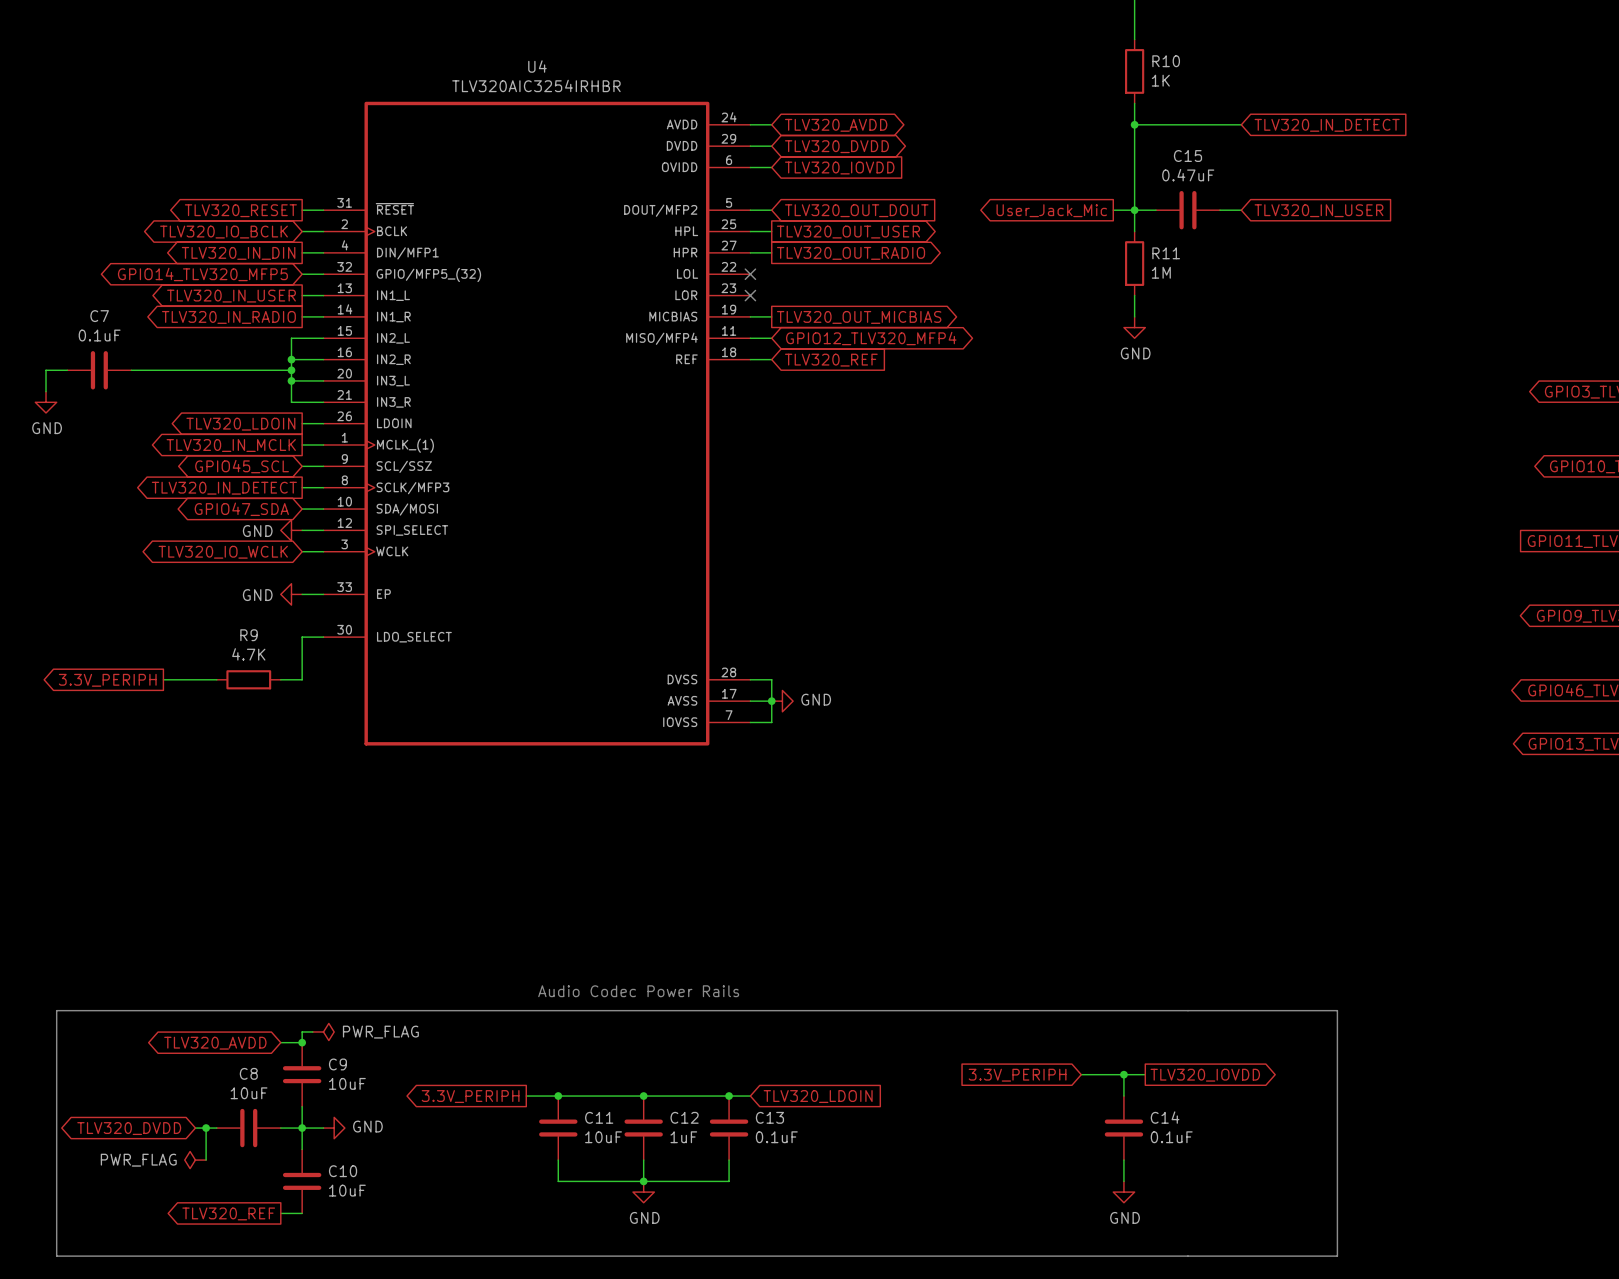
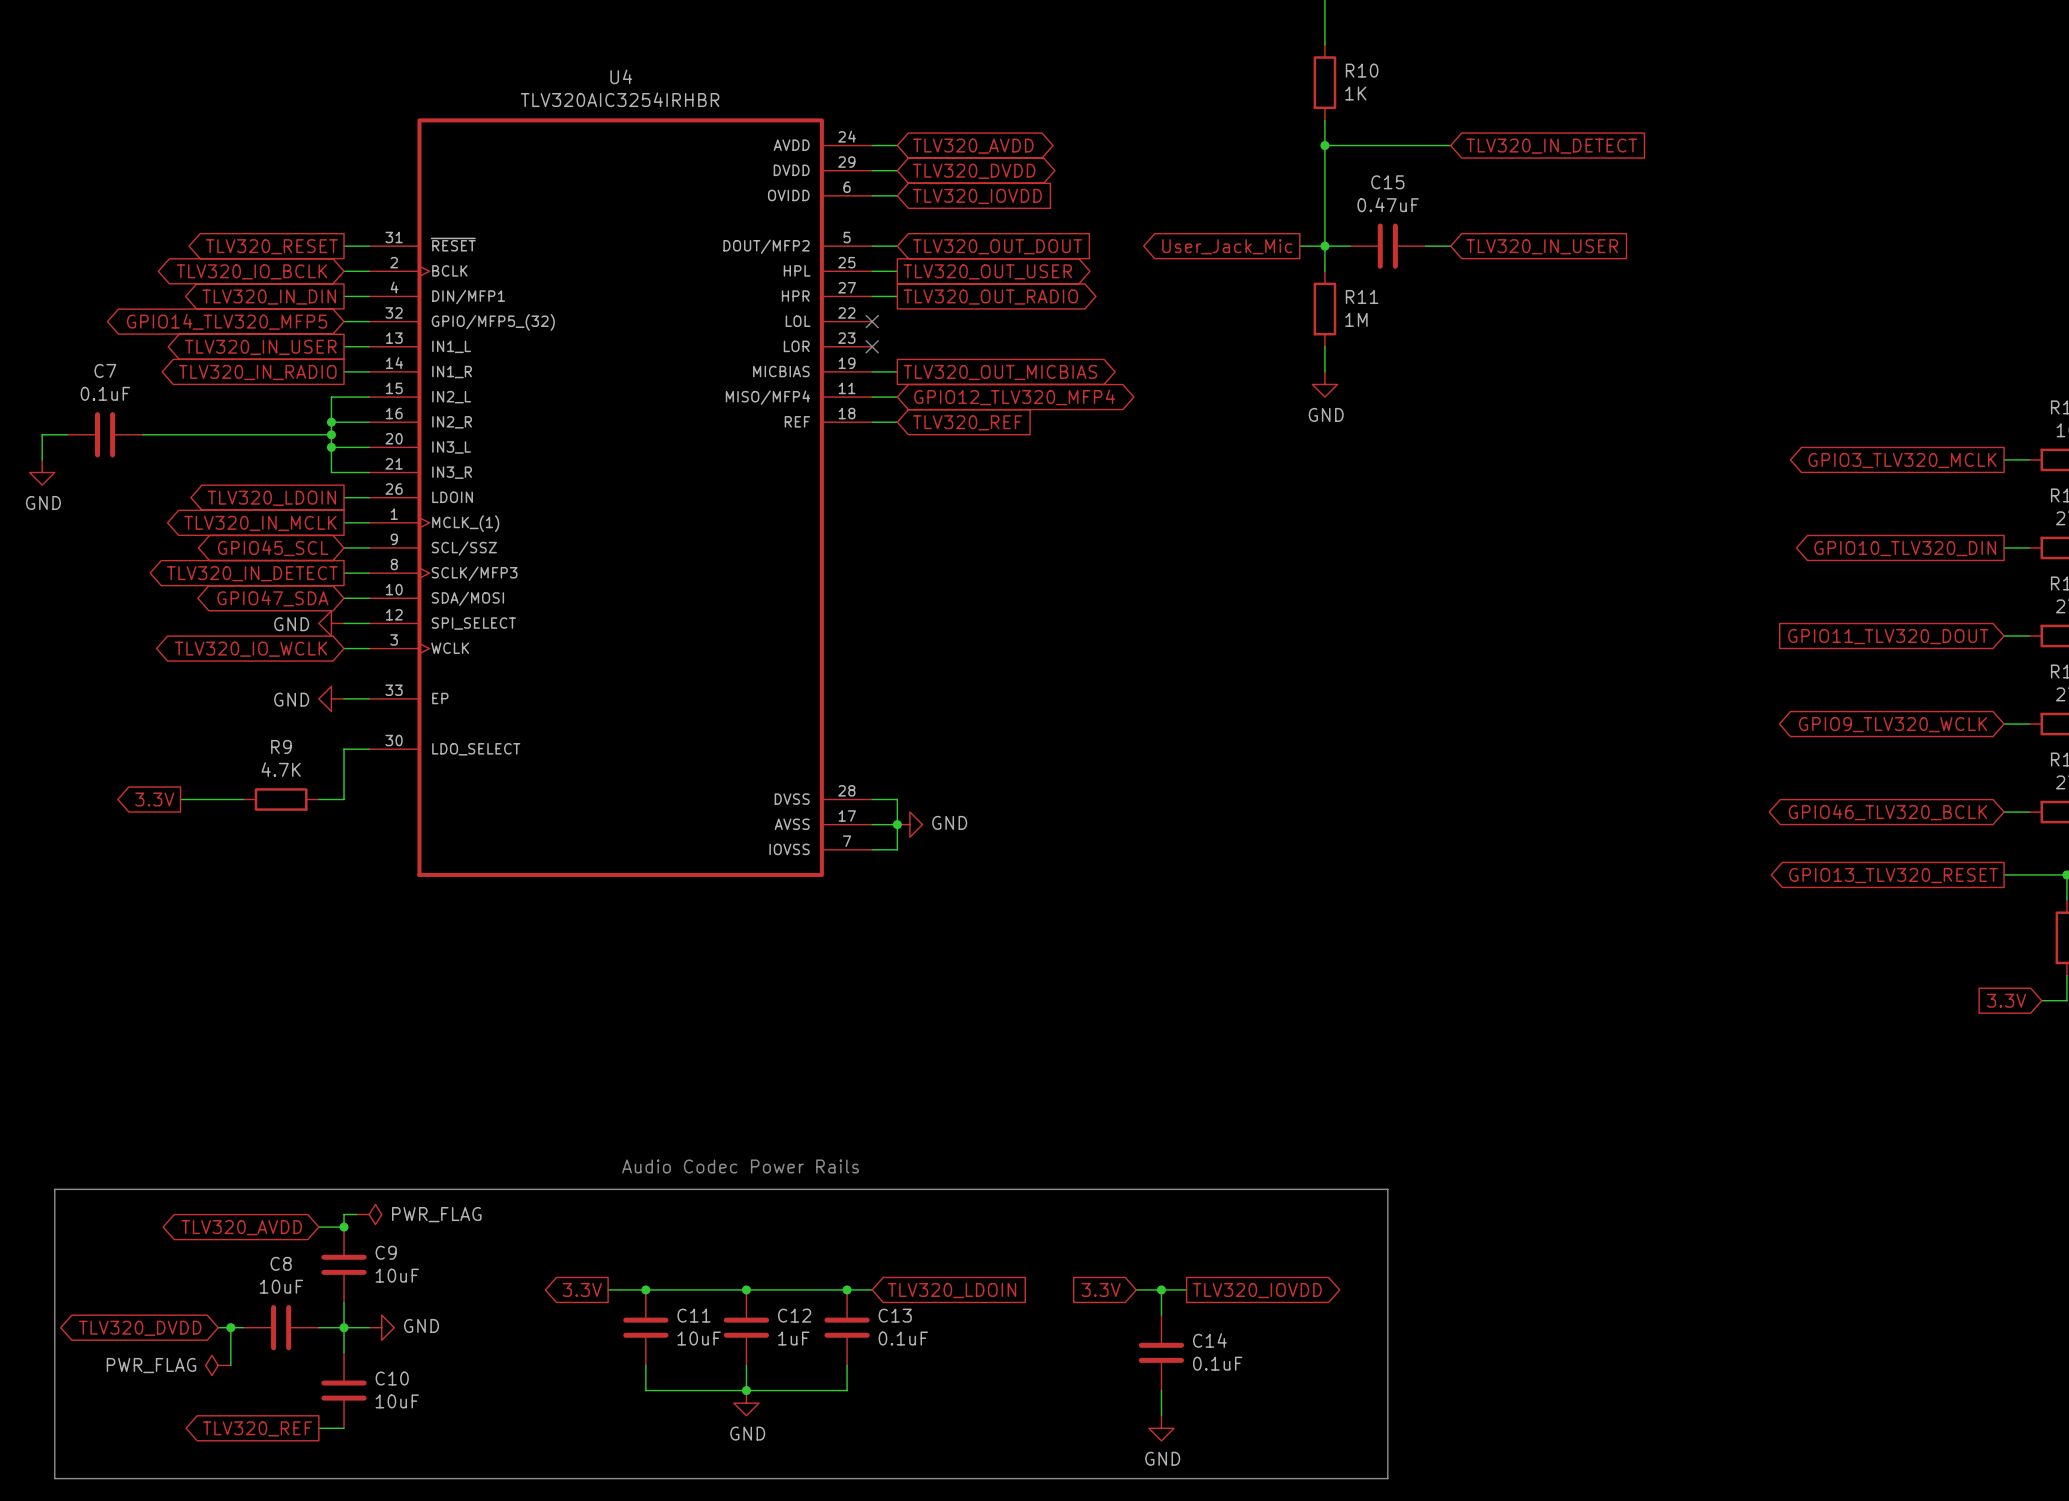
global label: 3.3V_PERIPH (107, 680) -> 3.3V (154, 799)
line: (1187, 1010) (1337, 1010) (1337, 1256) (1187, 1256) -> (1387, 1189) (1387, 1478)
wire: (1081, 1074) (1145, 1074) -> none
wire: (1123, 1074) (1123, 1096) -> (1161, 1289) (1161, 1315)
junction: (1123, 1074) -> none
global label: 3.3V_PERIPH (1017, 1075) -> none
global label position: TLV320_IOVDD (1205, 1075) -> TLV320_IOVDD (1257, 1290)
global label: 3.3V_PERIPH (470, 1096) -> 3.3V (582, 1289)
global label: none -> 3.3V (1101, 1289)
wire: none -> (1136, 1289) (1186, 1289)
junction: none -> (1161, 1289)
C14 position: (1123, 1128) -> (1161, 1352)
wire: (1123, 1160) (1123, 1181) -> (1161, 1390) (1161, 1415)
power symbol position: GND (1123, 1192) -> GND (1161, 1428)

